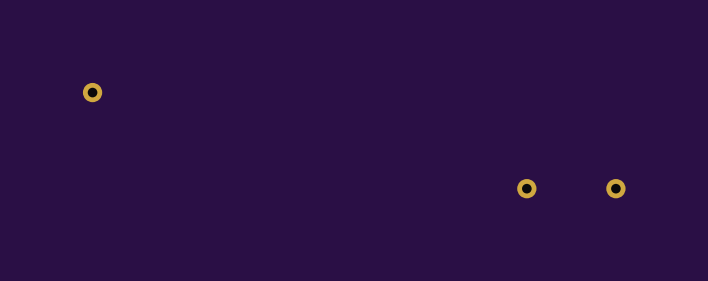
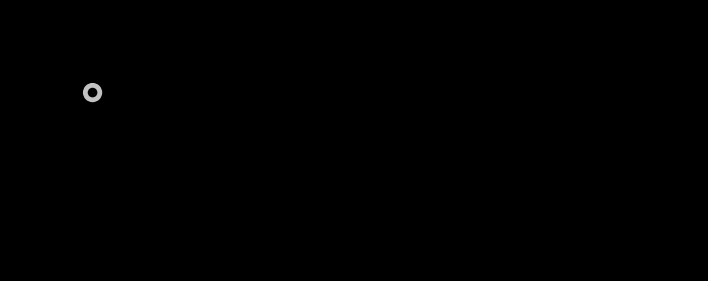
via: (526, 188) -> none
via: (615, 188) -> none

